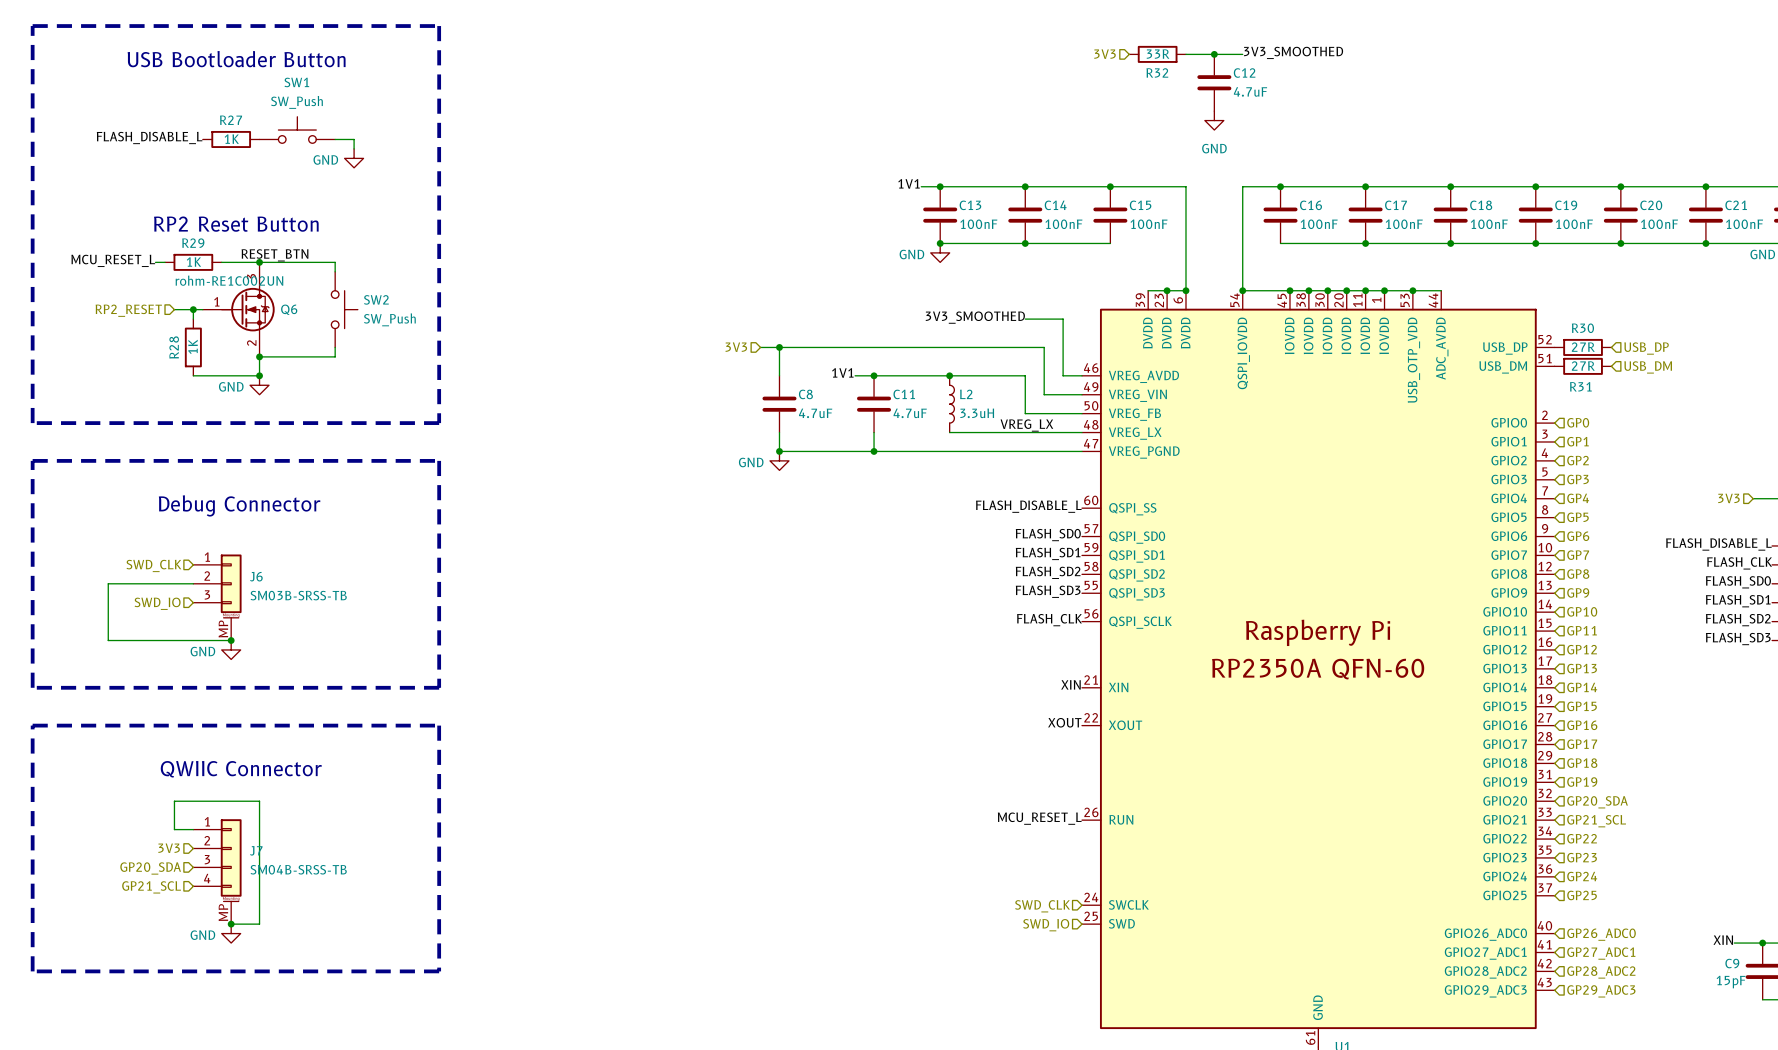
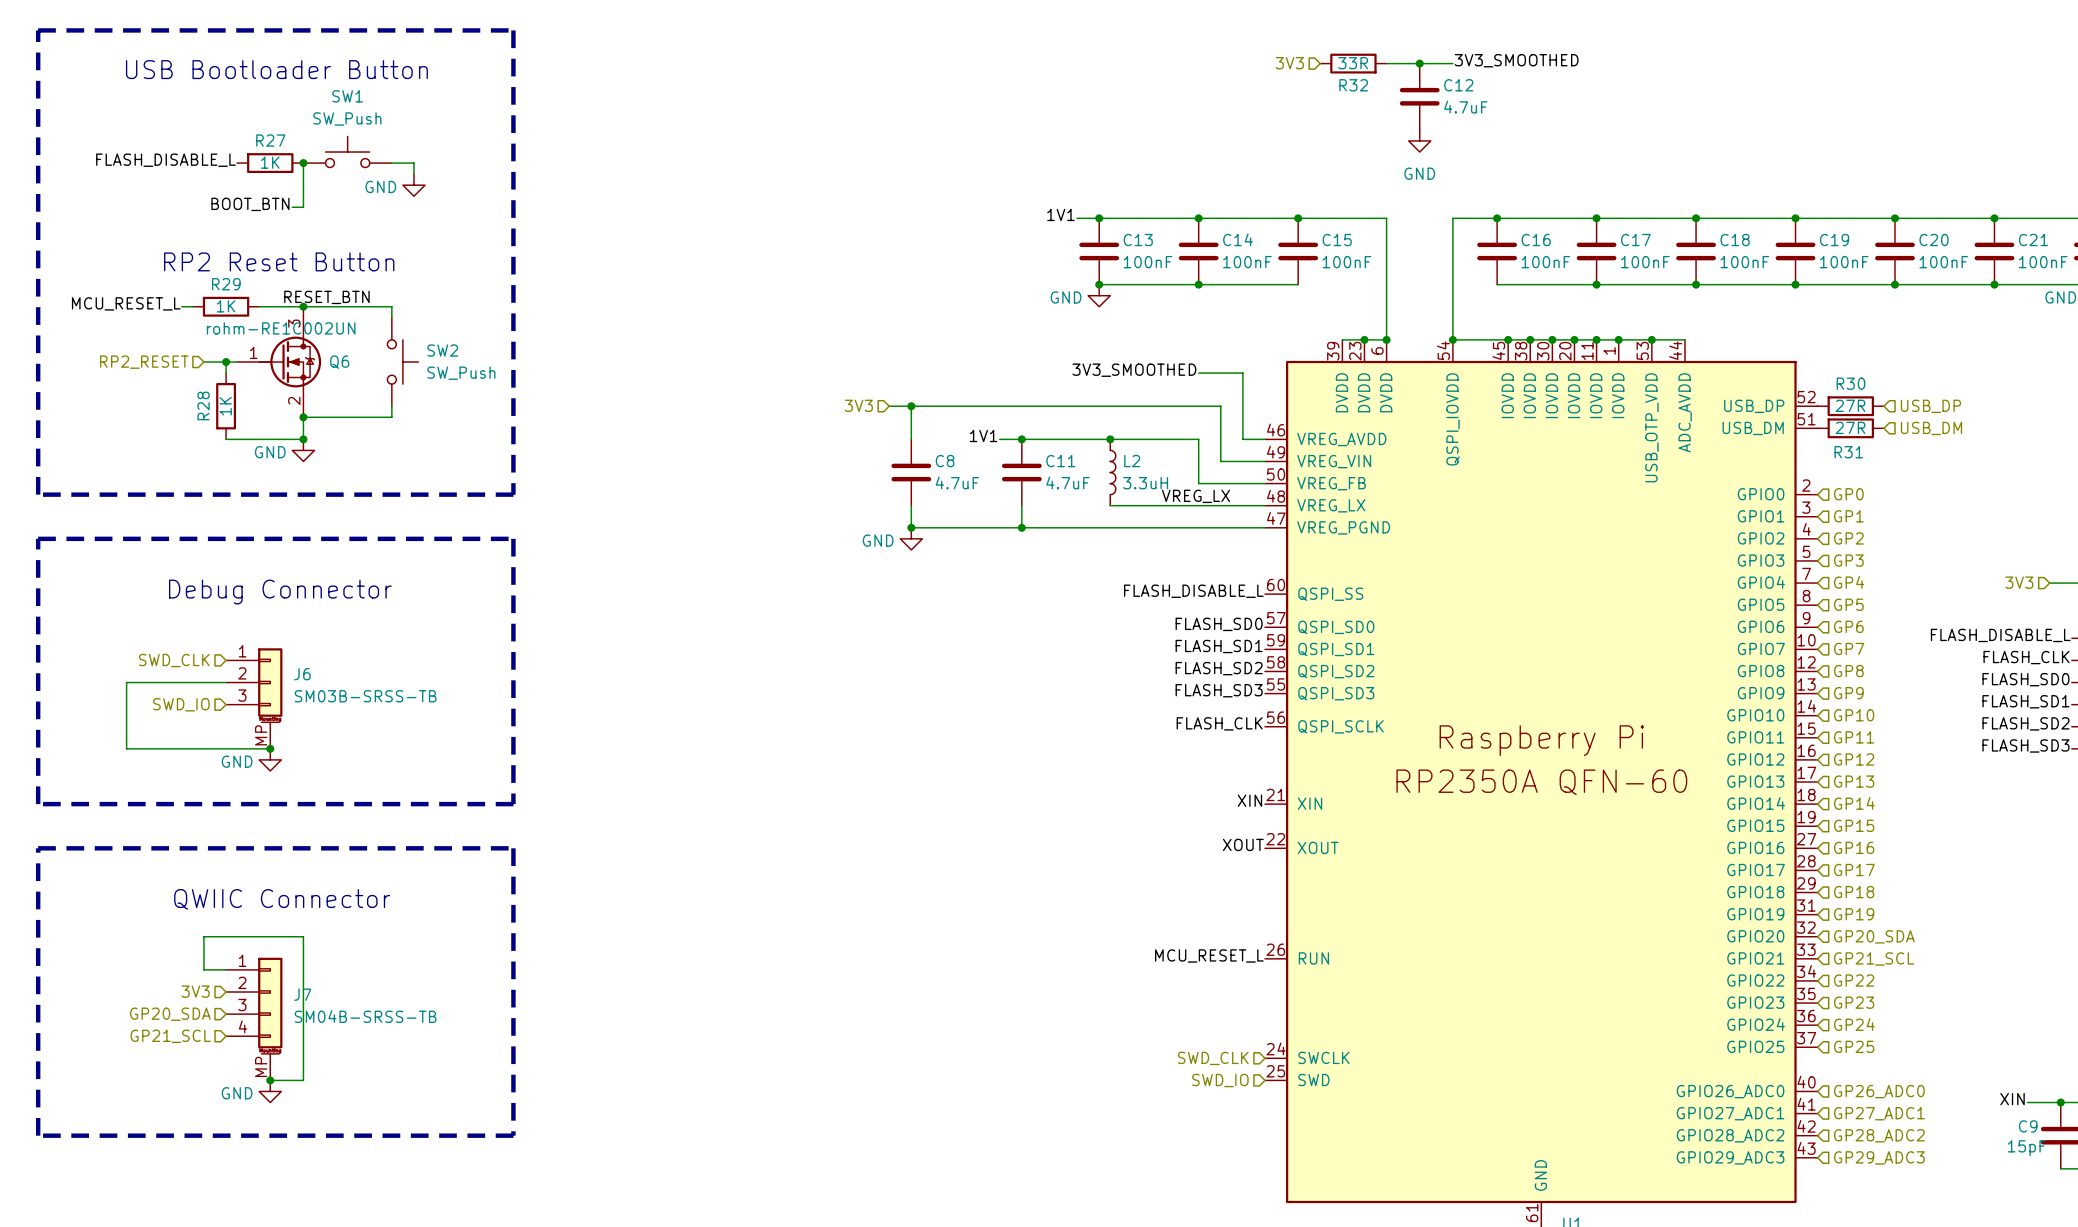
wire: none -> (303, 163) (303, 207) (292, 207)
junction: none -> (303, 163)
label: none -> BOOT_BTN (250, 204)

